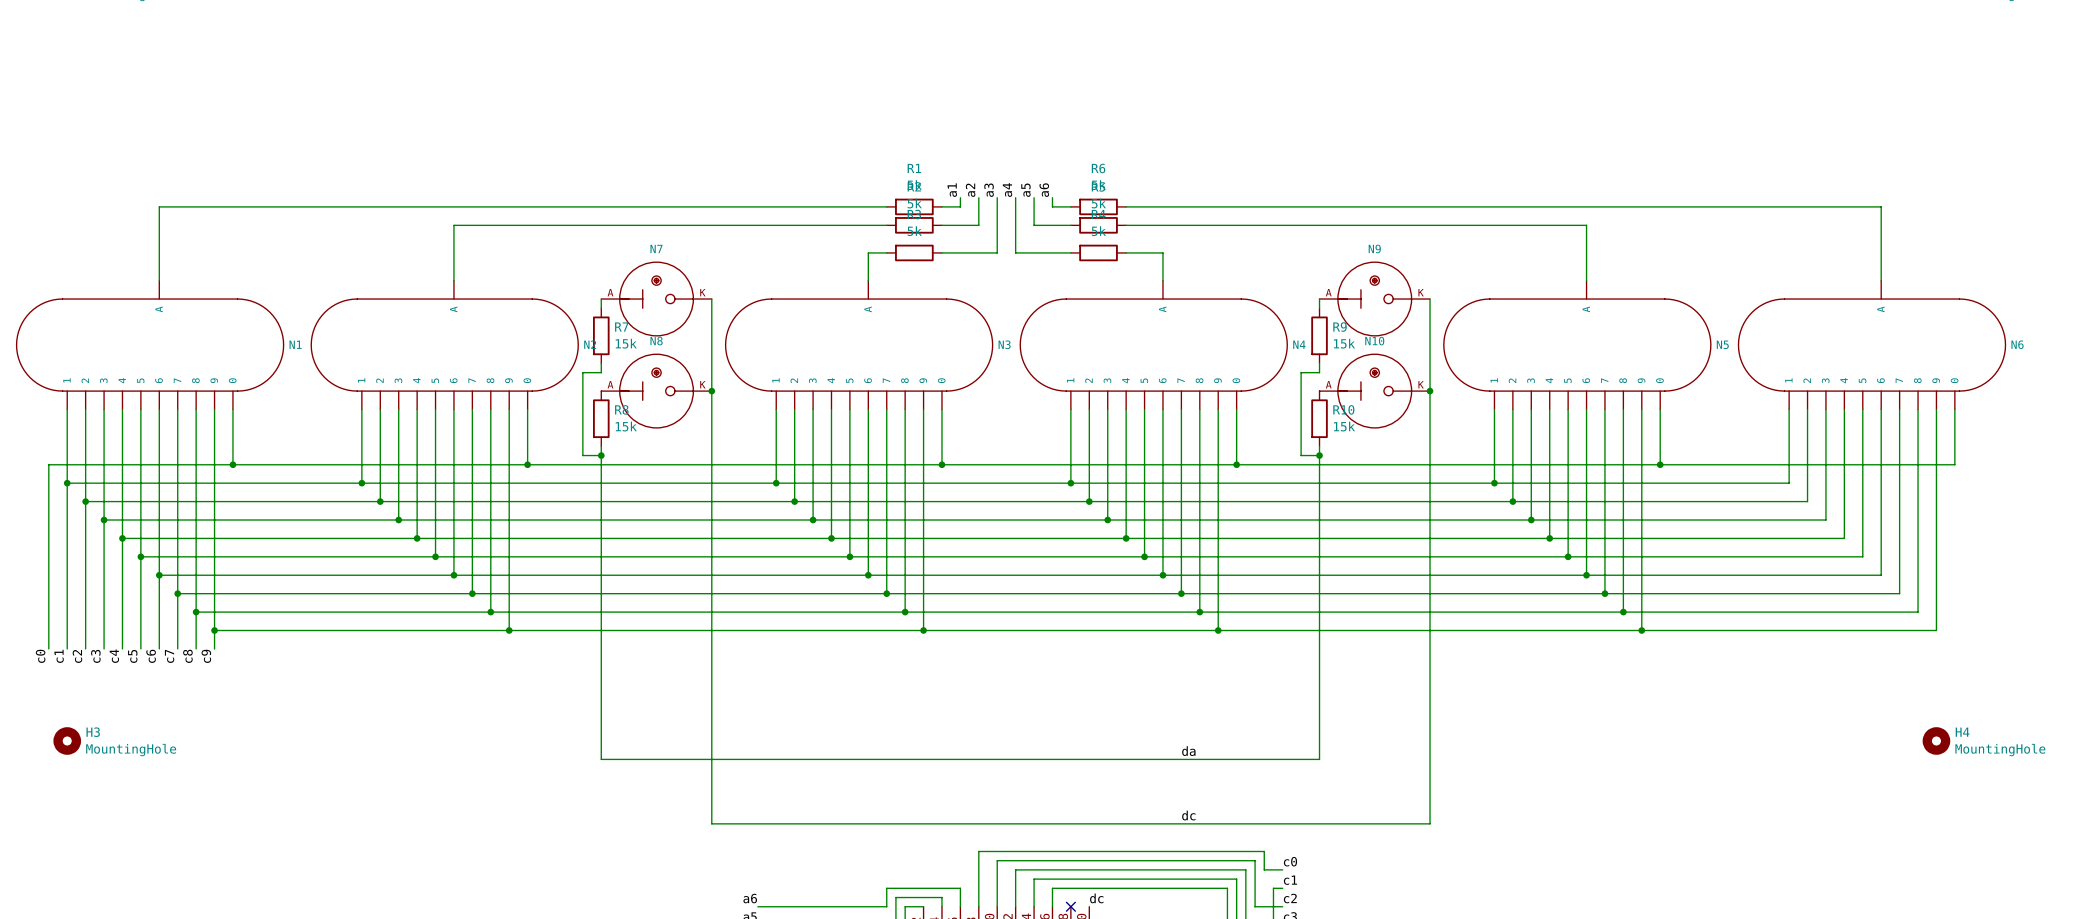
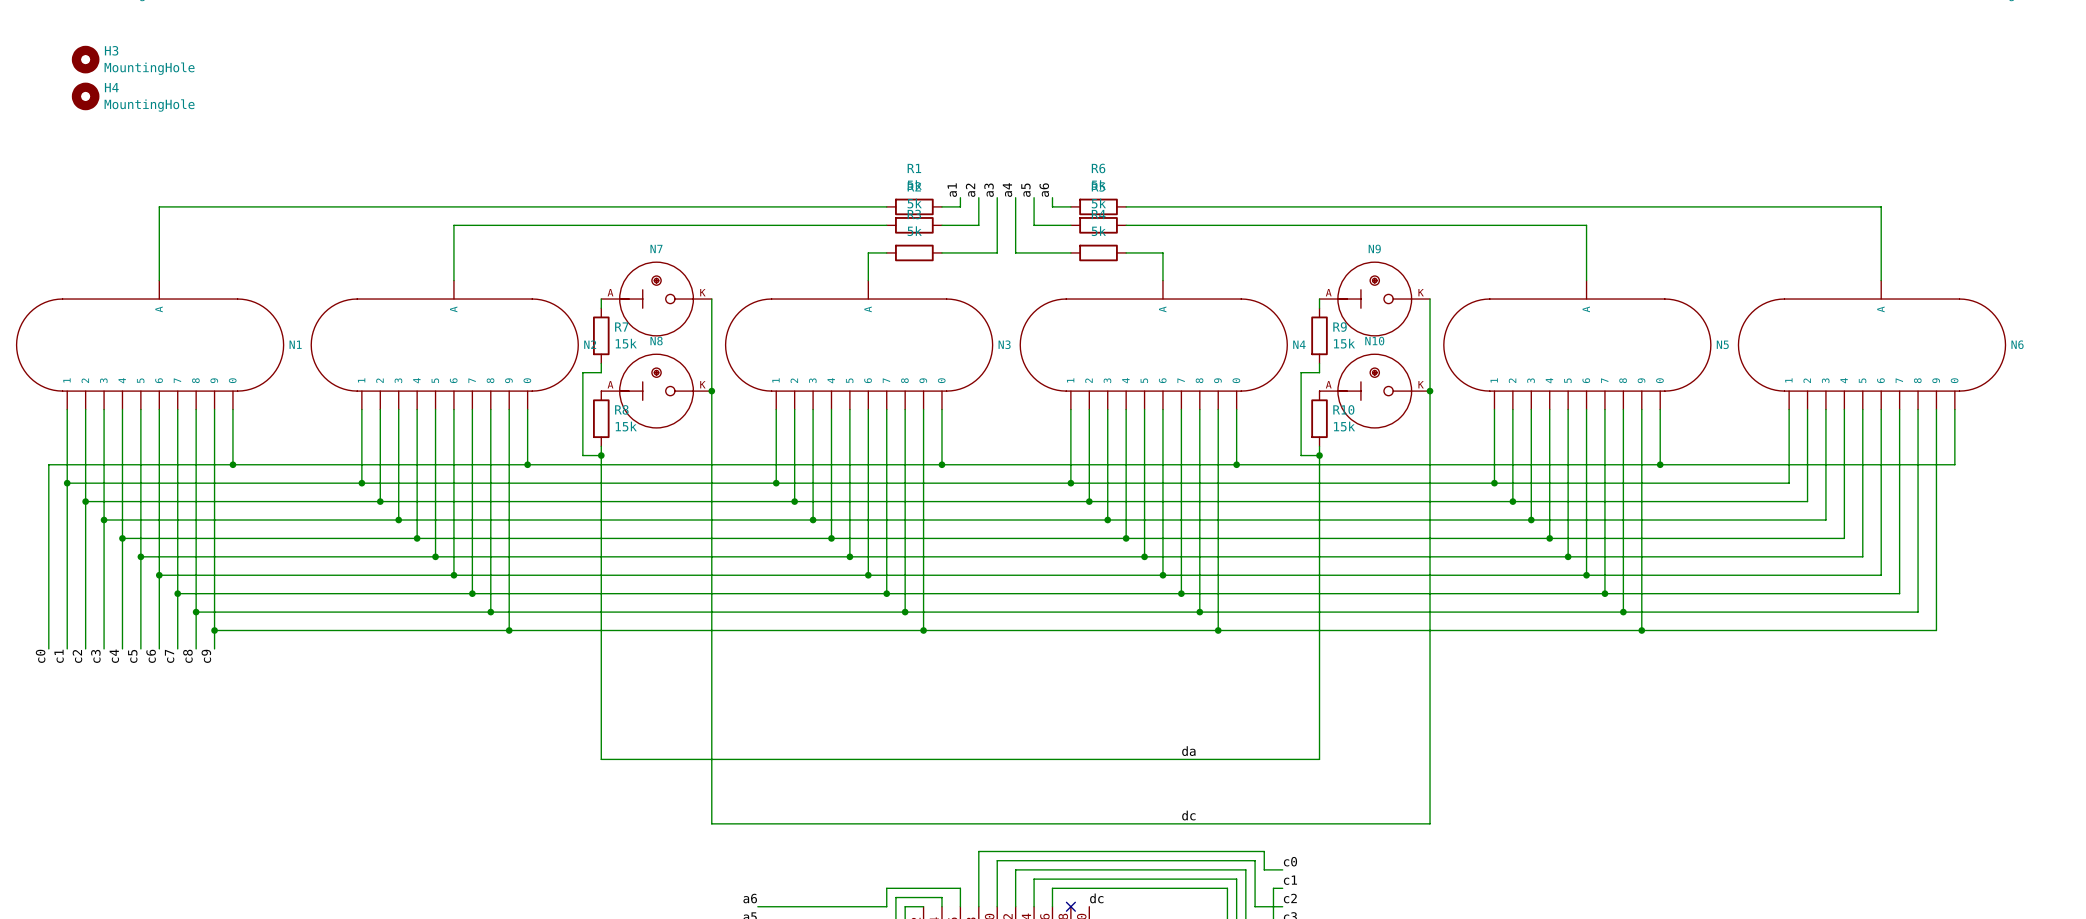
H3 position: (67, 740) -> (85, 59)
H4 position: (1936, 740) -> (85, 96)

